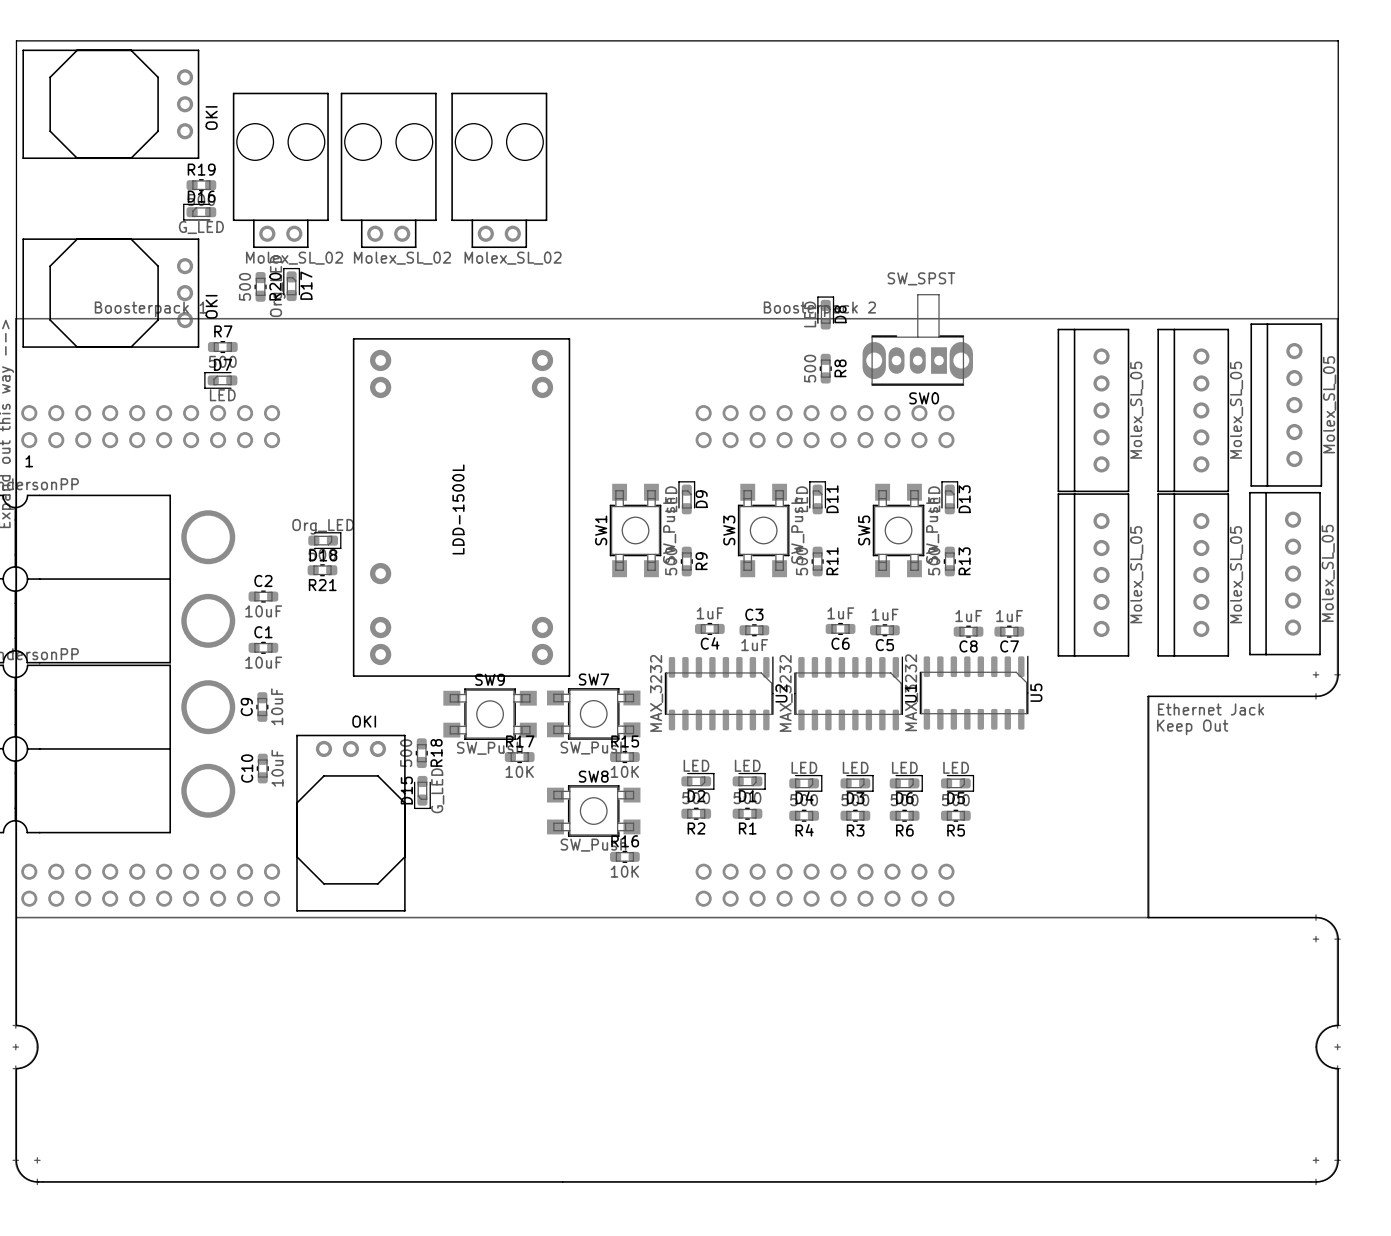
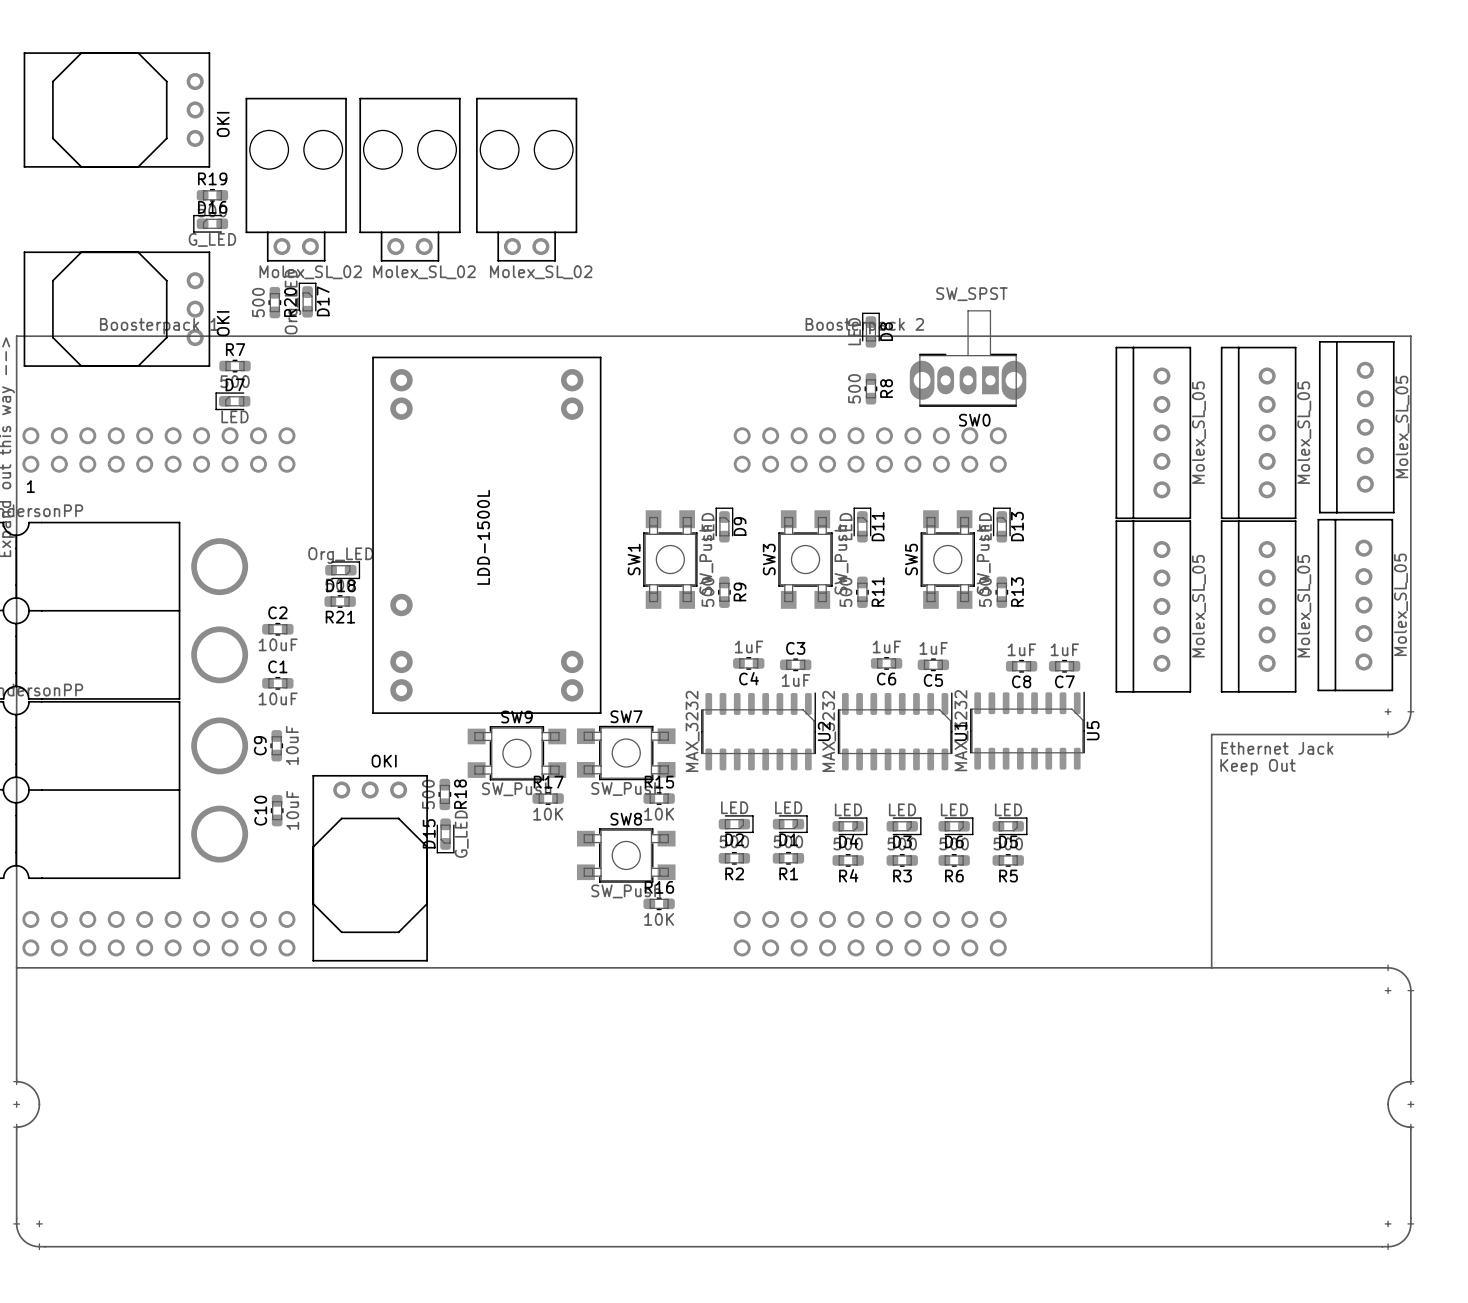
board edge: (16, 40) (1338, 40) (1337, 680) (1331, 690) (1319, 696) (1148, 696) (1148, 917) (1319, 917) (1329, 922) (1336, 930) (1338, 1025) (1329, 1027) (1322, 1031) (1318, 1038) (1316, 1047) (1318, 1055) (1322, 1062) (1329, 1066) (1338, 1068) (1338, 1160) (1333, 1173) (1324, 1180) (1316, 1181) (38, 1181) (24, 1177) (19, 1171) (16, 1163) (16, 1068) (24, 1066) (31, 1062) (36, 1055) (38, 1047) (36, 1038) (31, 1031) (24, 1027) (16, 1025) (16, 40) -> none

